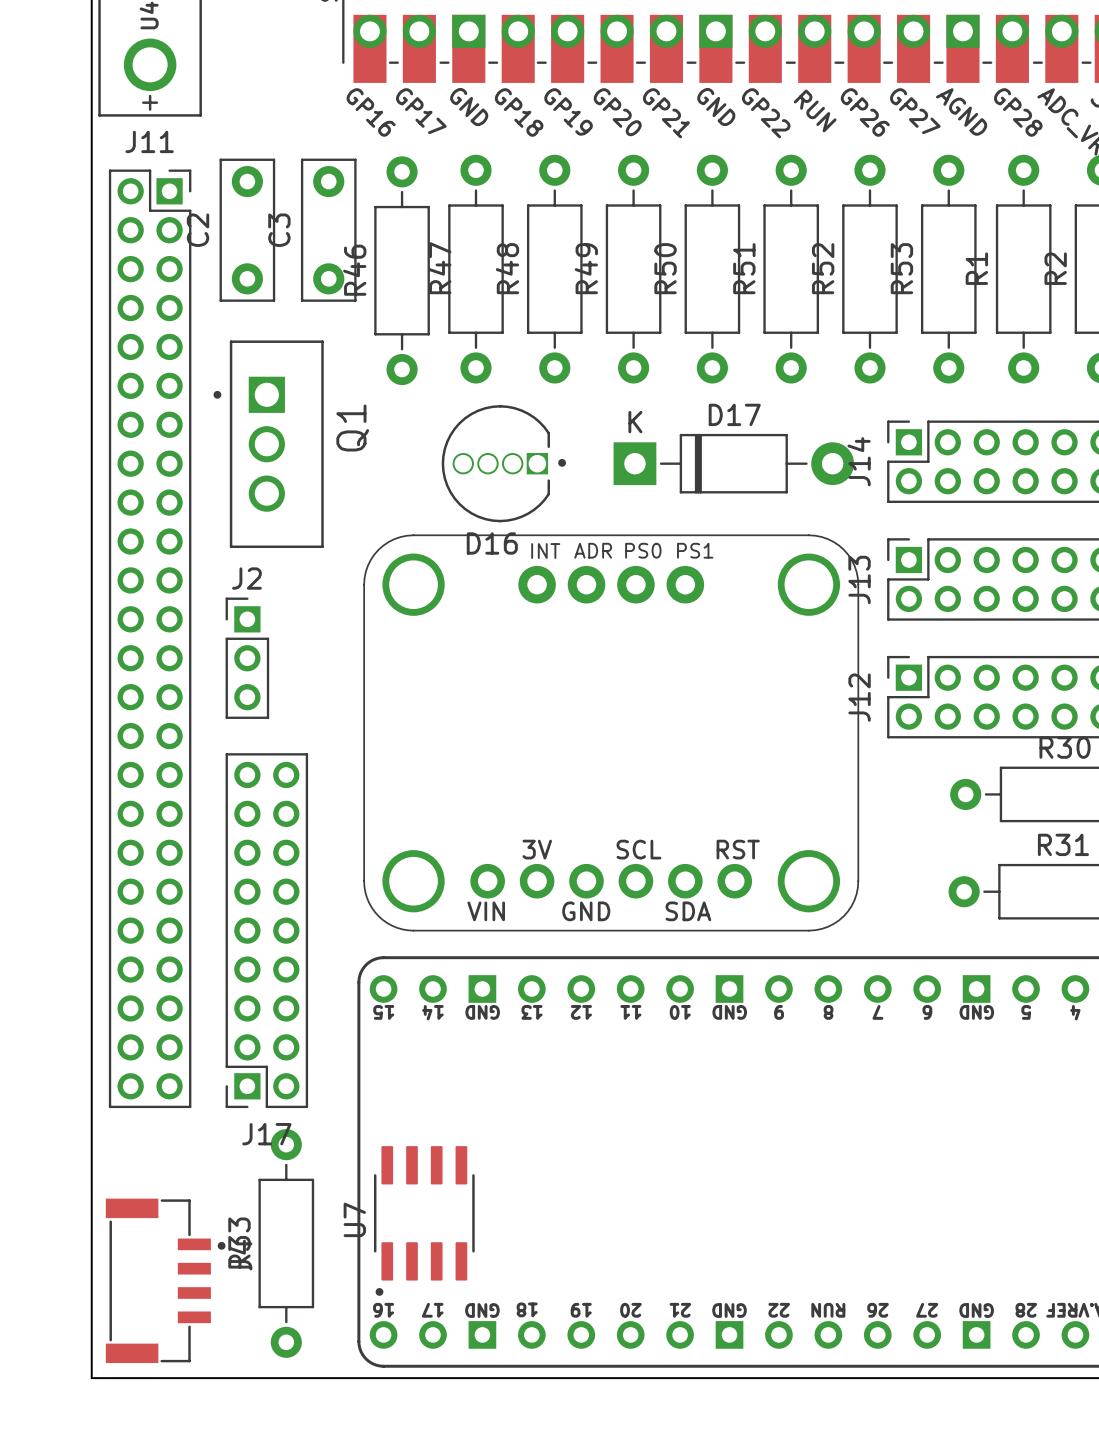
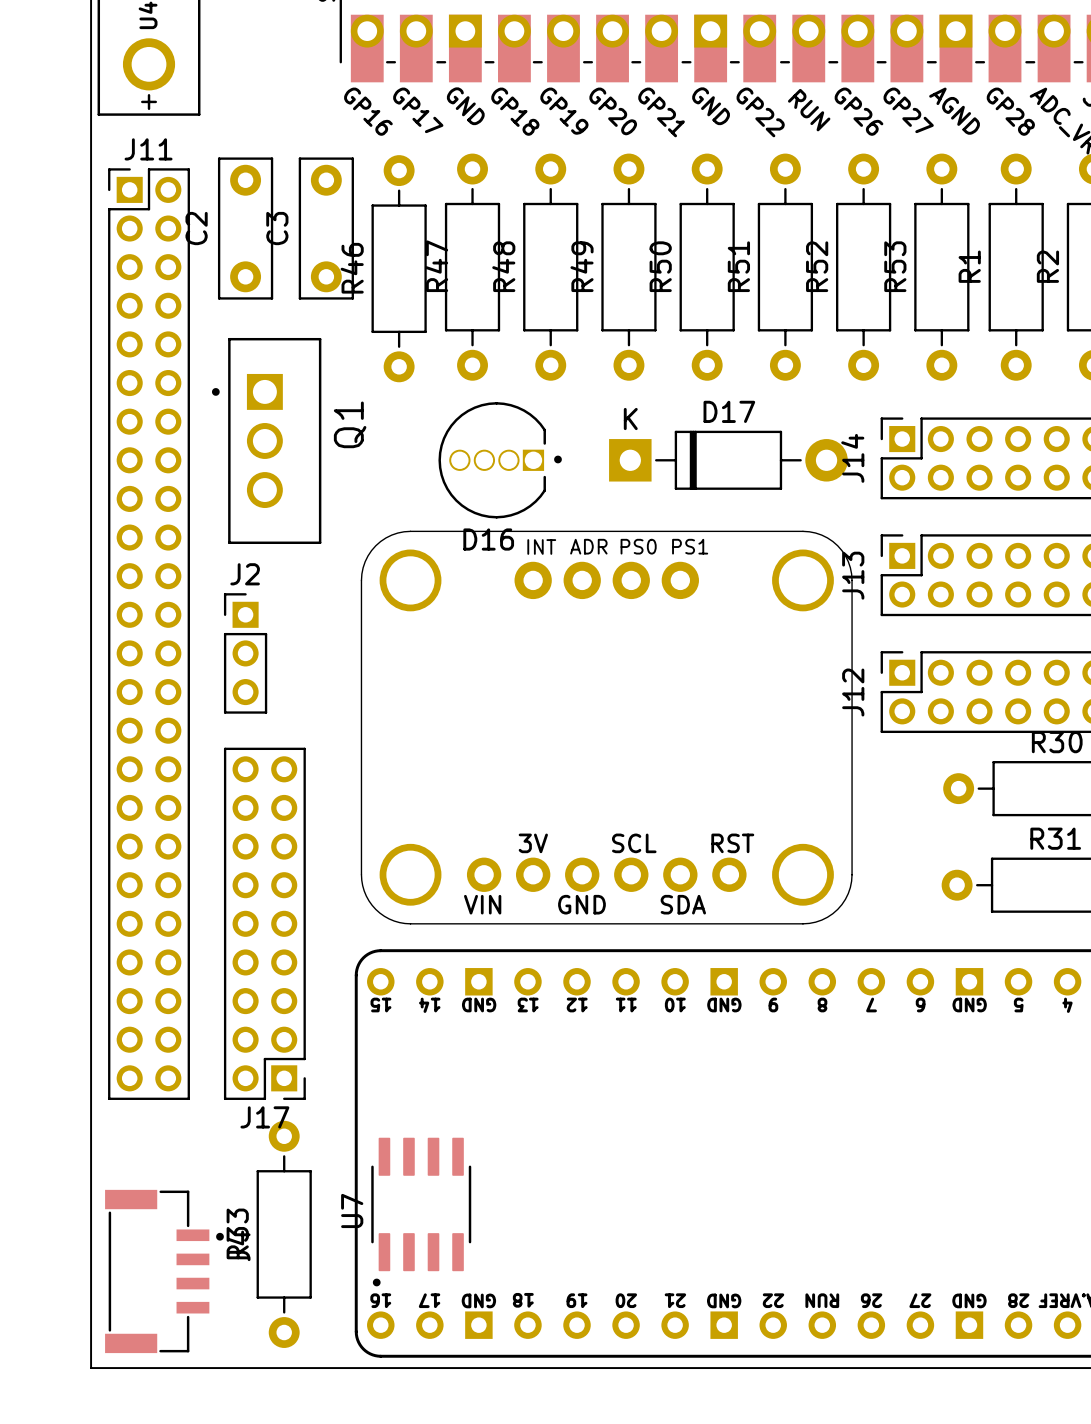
J11 footprint: [108, 169, 192, 1109] -> [108, 168, 190, 1100]
J17 footprint: [225, 753, 309, 1109] -> [223, 747, 306, 1100]

